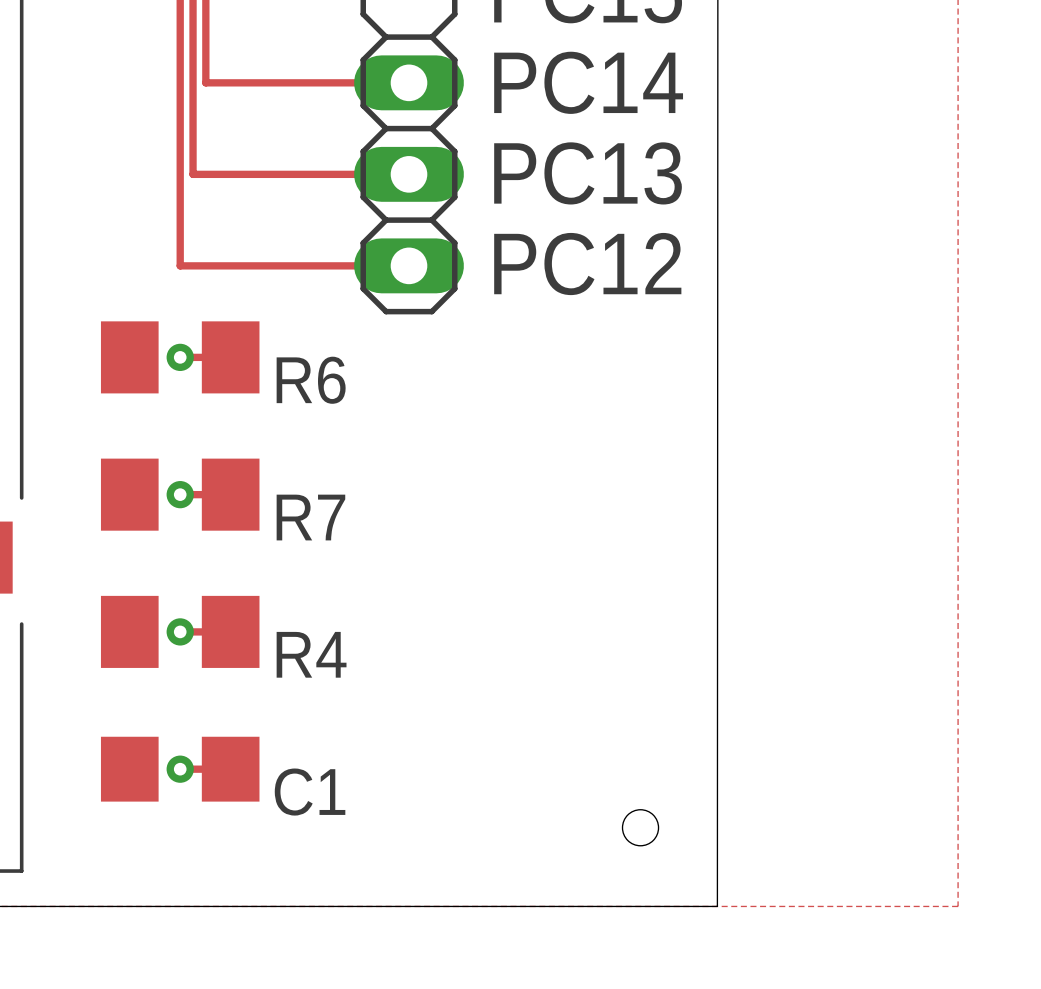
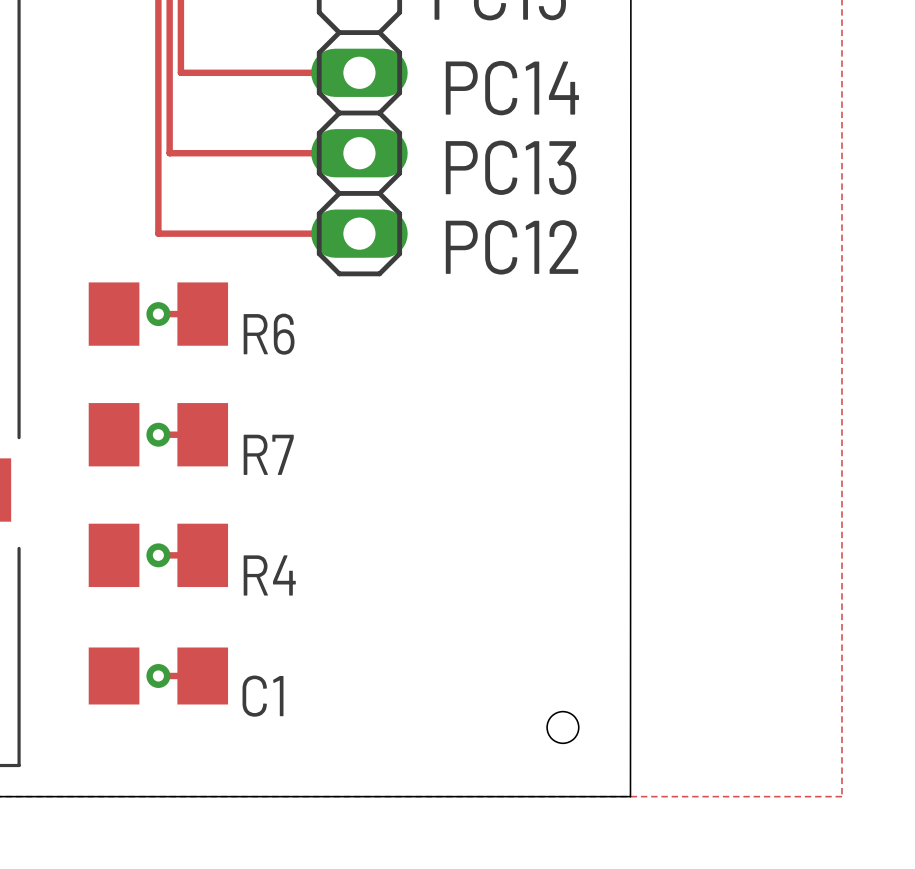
text position: PC14 (588, 82) -> PC14 (512, 88)
text position: PC13 (588, 173) -> PC13 (511, 167)
text position: PC12 (587, 264) -> PC12 (512, 247)

